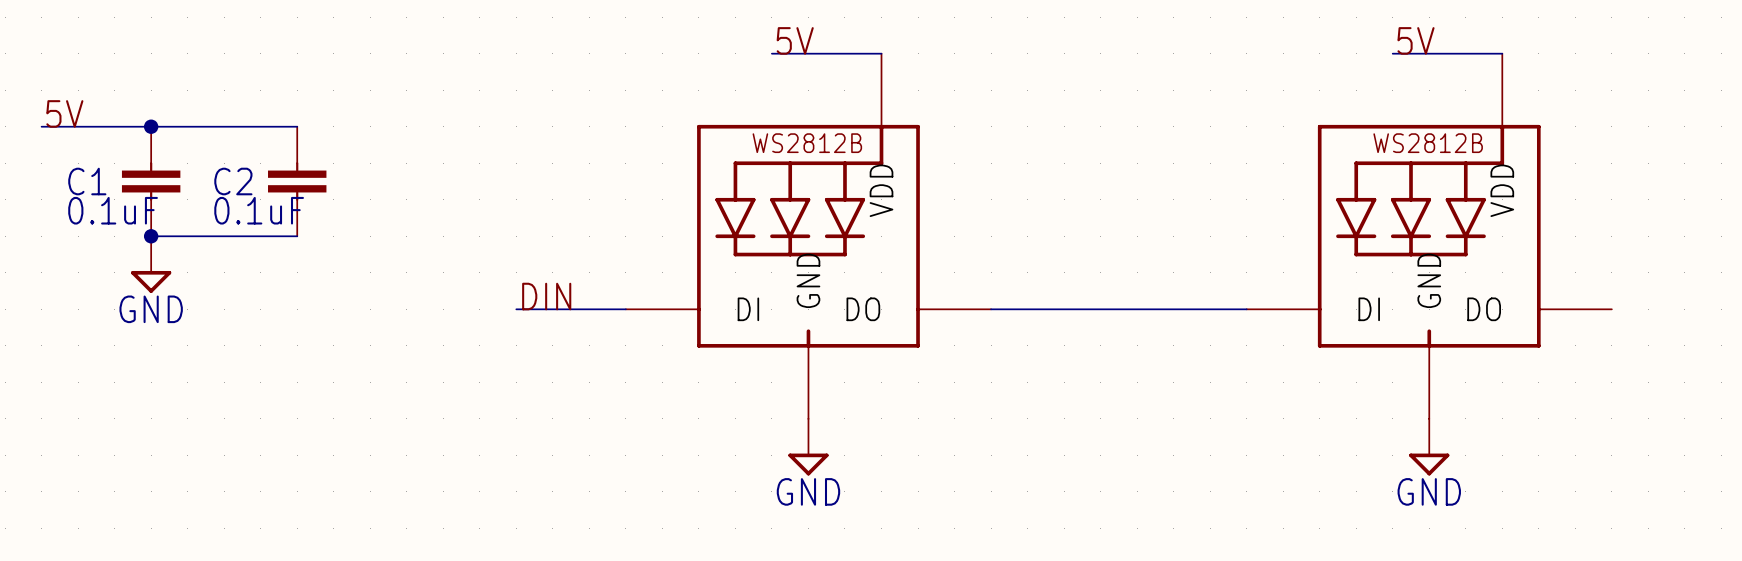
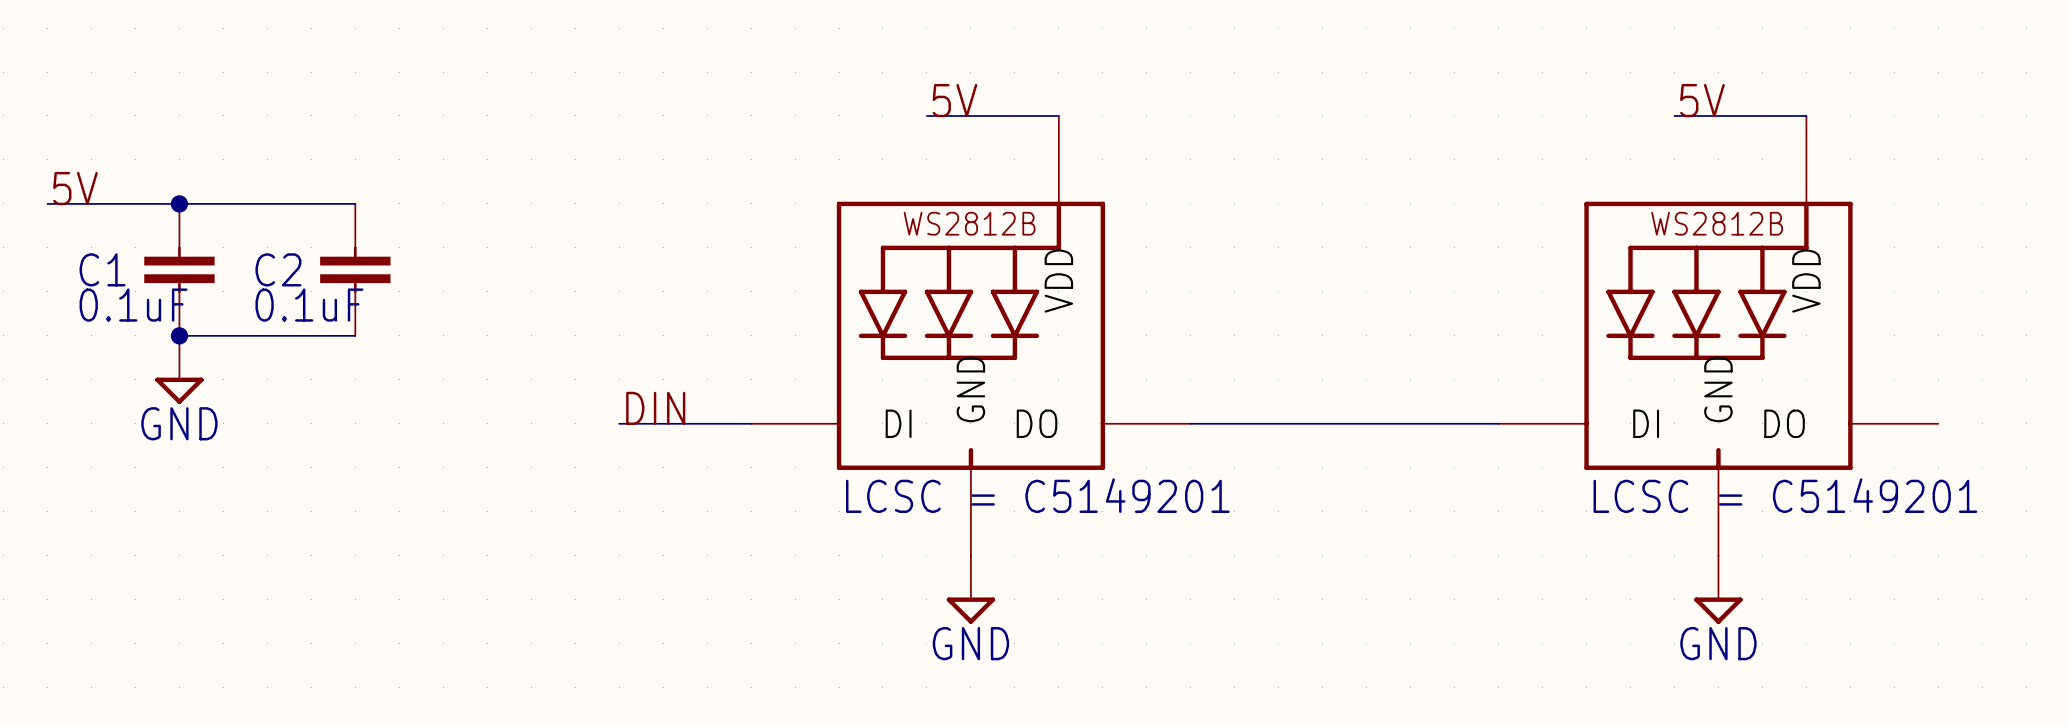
part text: none -> LCSC = C5149201 (1037, 495)
part text: none -> LCSC = C5149201 (1785, 495)

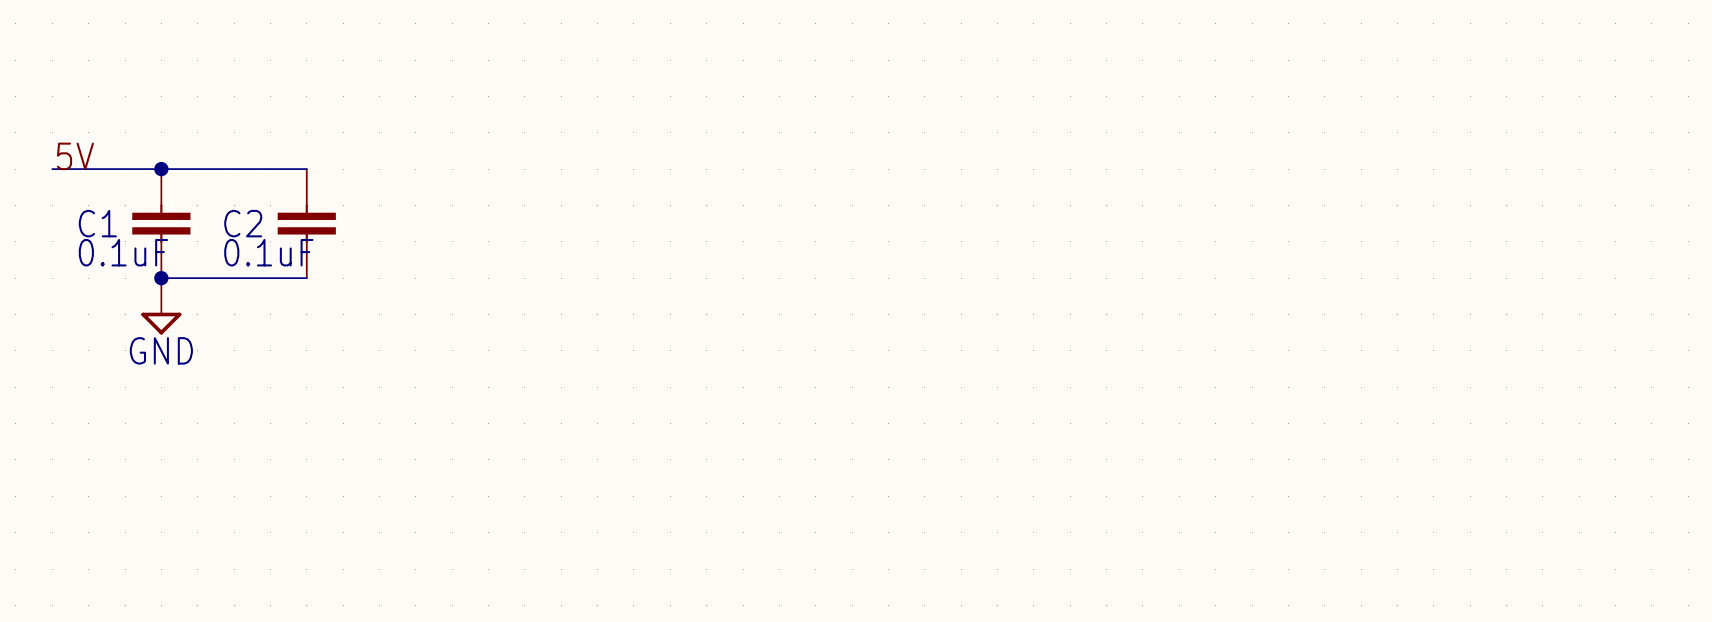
label: 5V (954, 100) -> none
label: 5V (1702, 100) -> none
wire: (926, 115) (1058, 115) -> none
wire: (1674, 115) (1806, 115) -> none
part: (970, 335) -> none
part: (1718, 335) -> none
label: DIN (655, 408) -> none
wire: (619, 423) (751, 423) -> none
wire: (1190, 423) (1498, 423) -> none
power symbol: GND (970, 589) -> none
power symbol: GND (1718, 589) -> none

